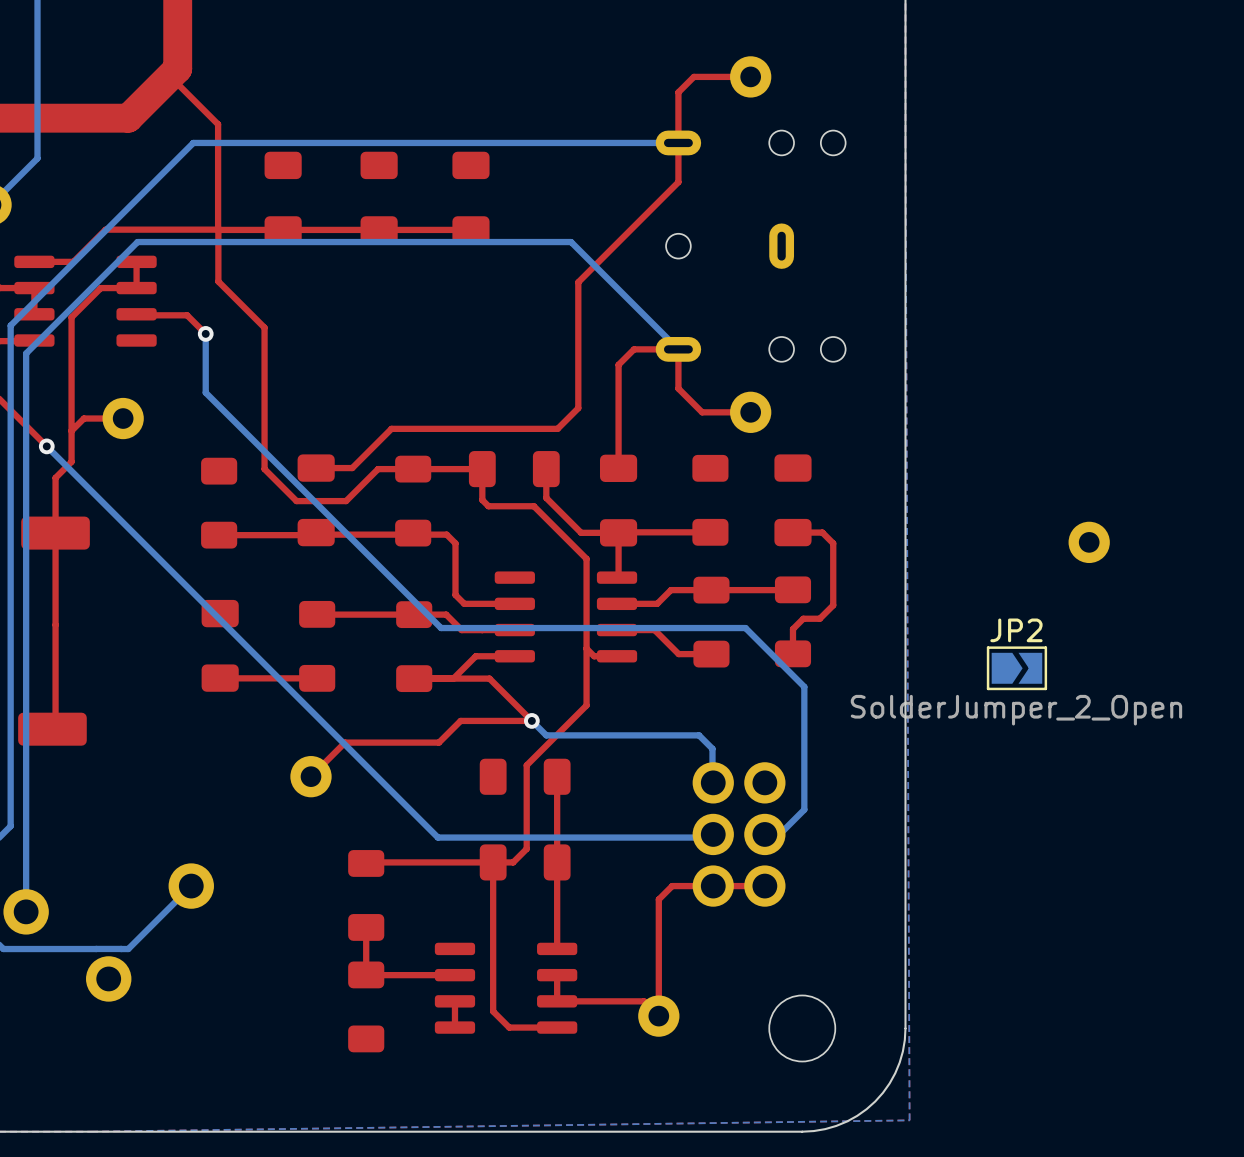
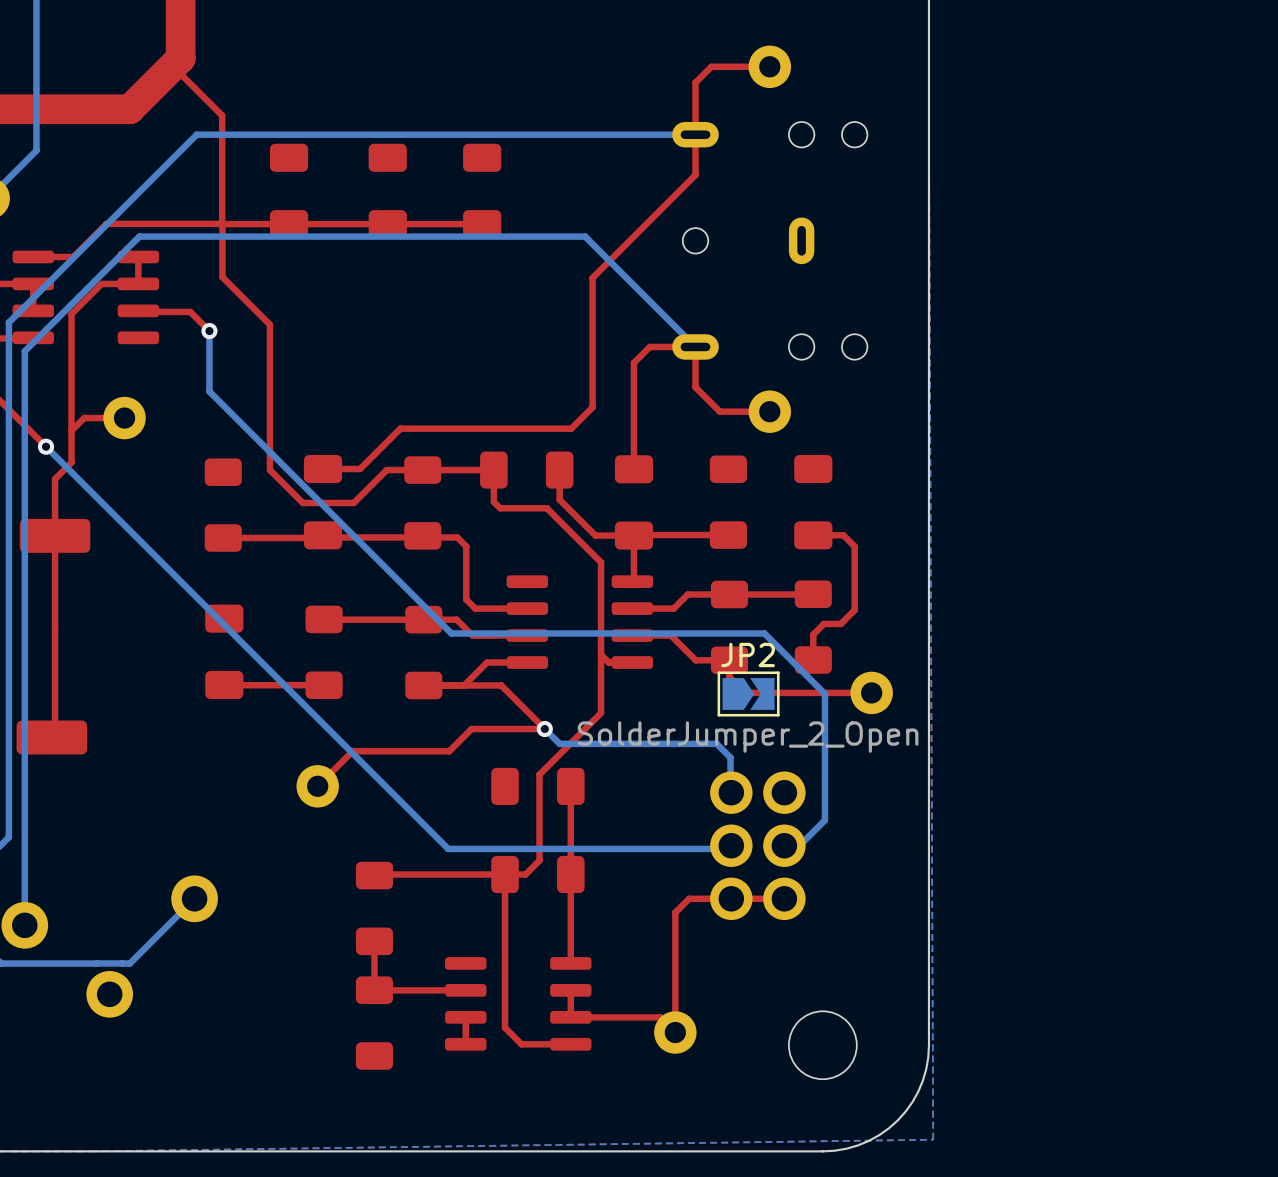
part position: (1089, 542) -> (871, 692)
top track: none -> (729, 660) (729, 677) (745, 692) (871, 692)
JP2 position: (1016, 668) -> (748, 693)

